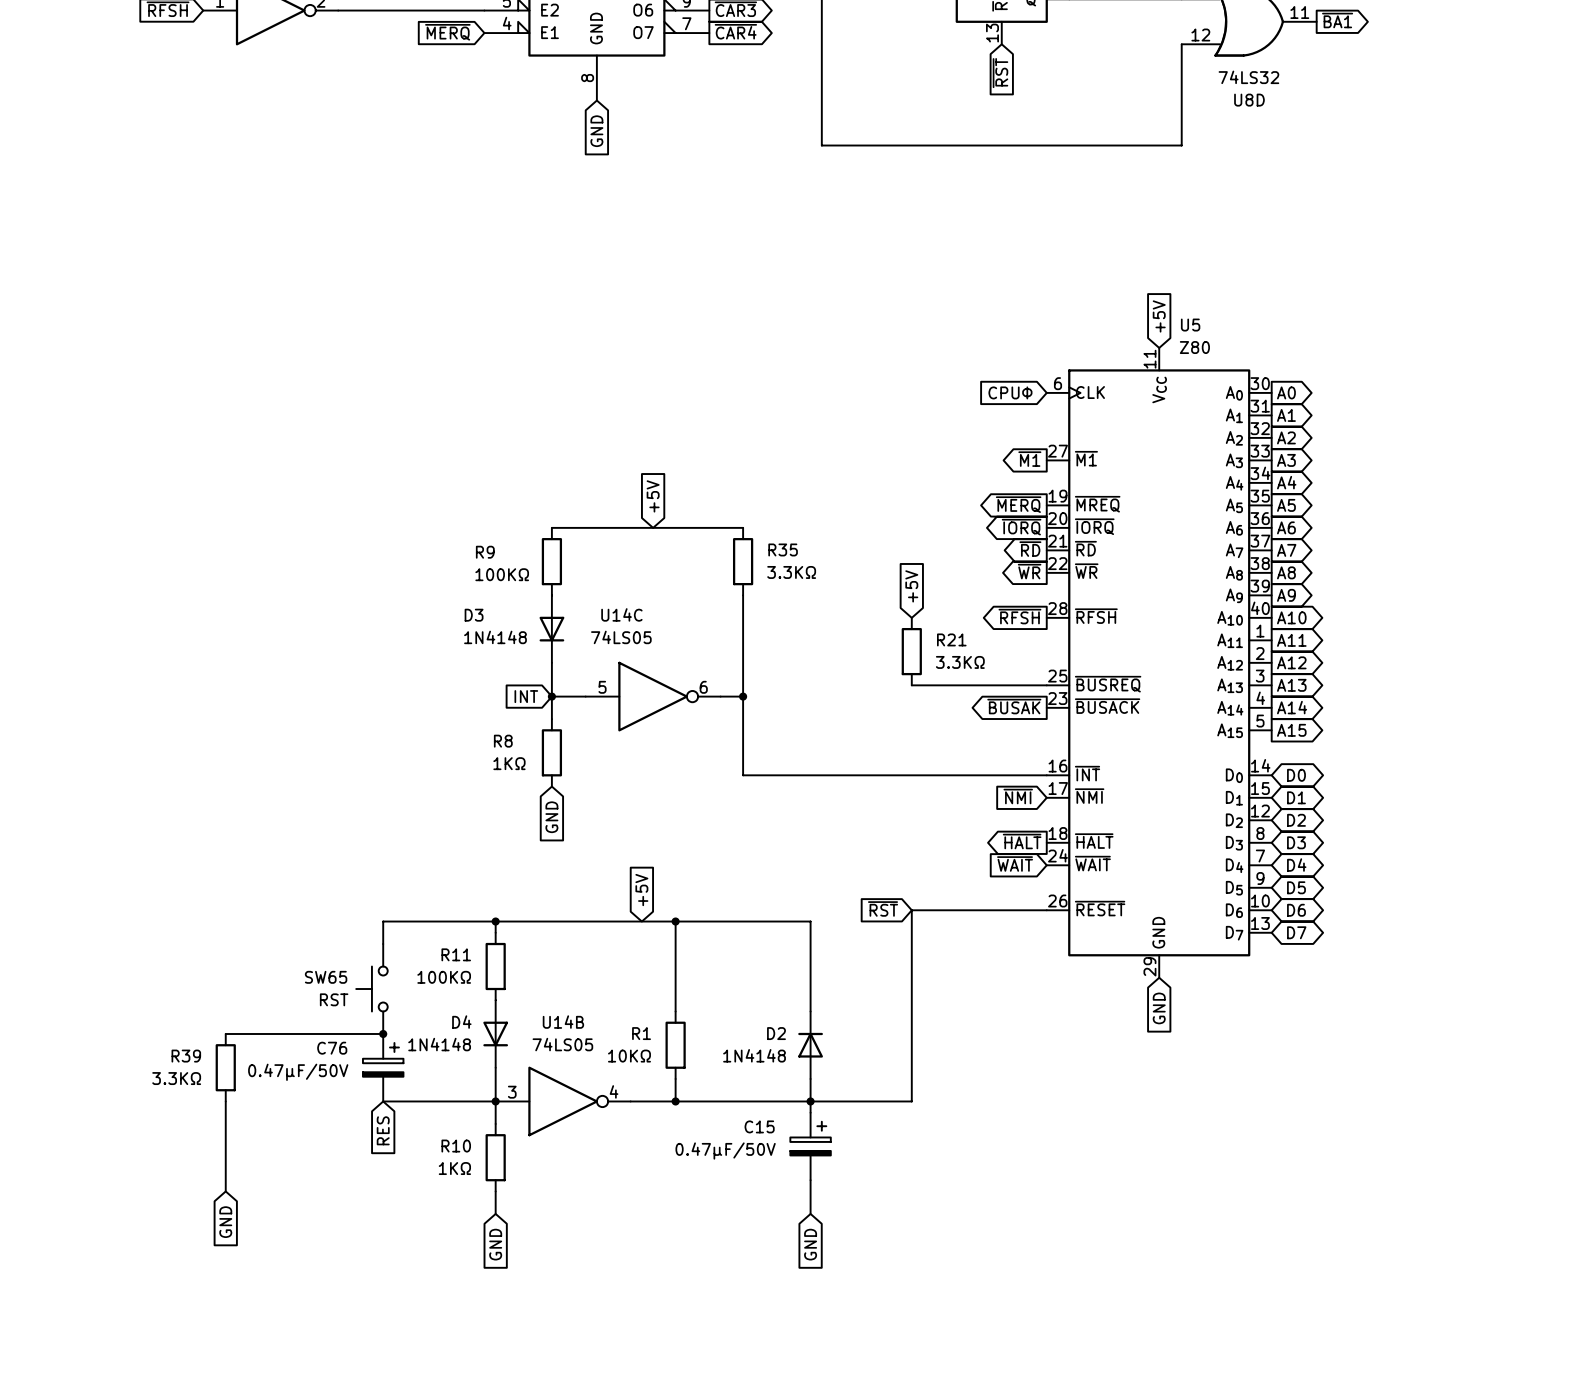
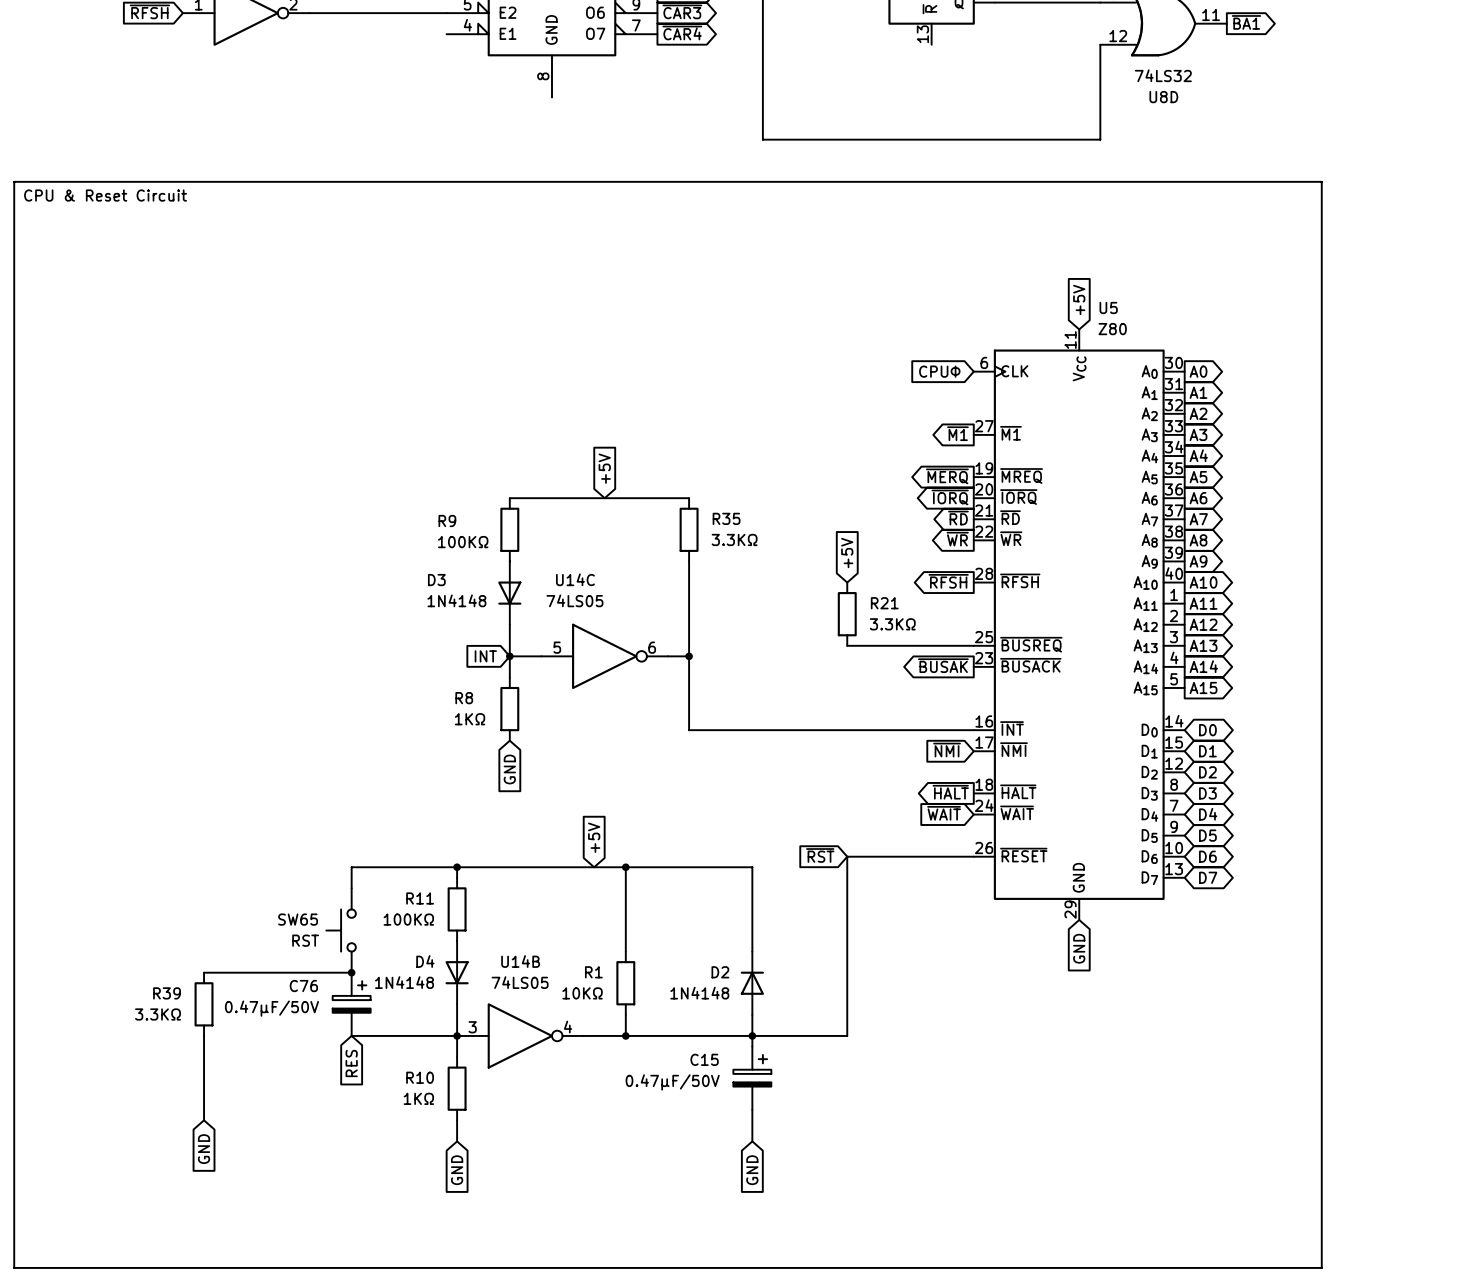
global label: ~{MERQ} (447, 32) -> none
global label: ~{RST} (1000, 73) -> none
global label: GND (596, 131) -> none
line: none -> (14, 181) (1321, 181) (1321, 1267) (14, 1267) (14, 181)
text: none -> CPU & Reset Circuit (105, 195)

